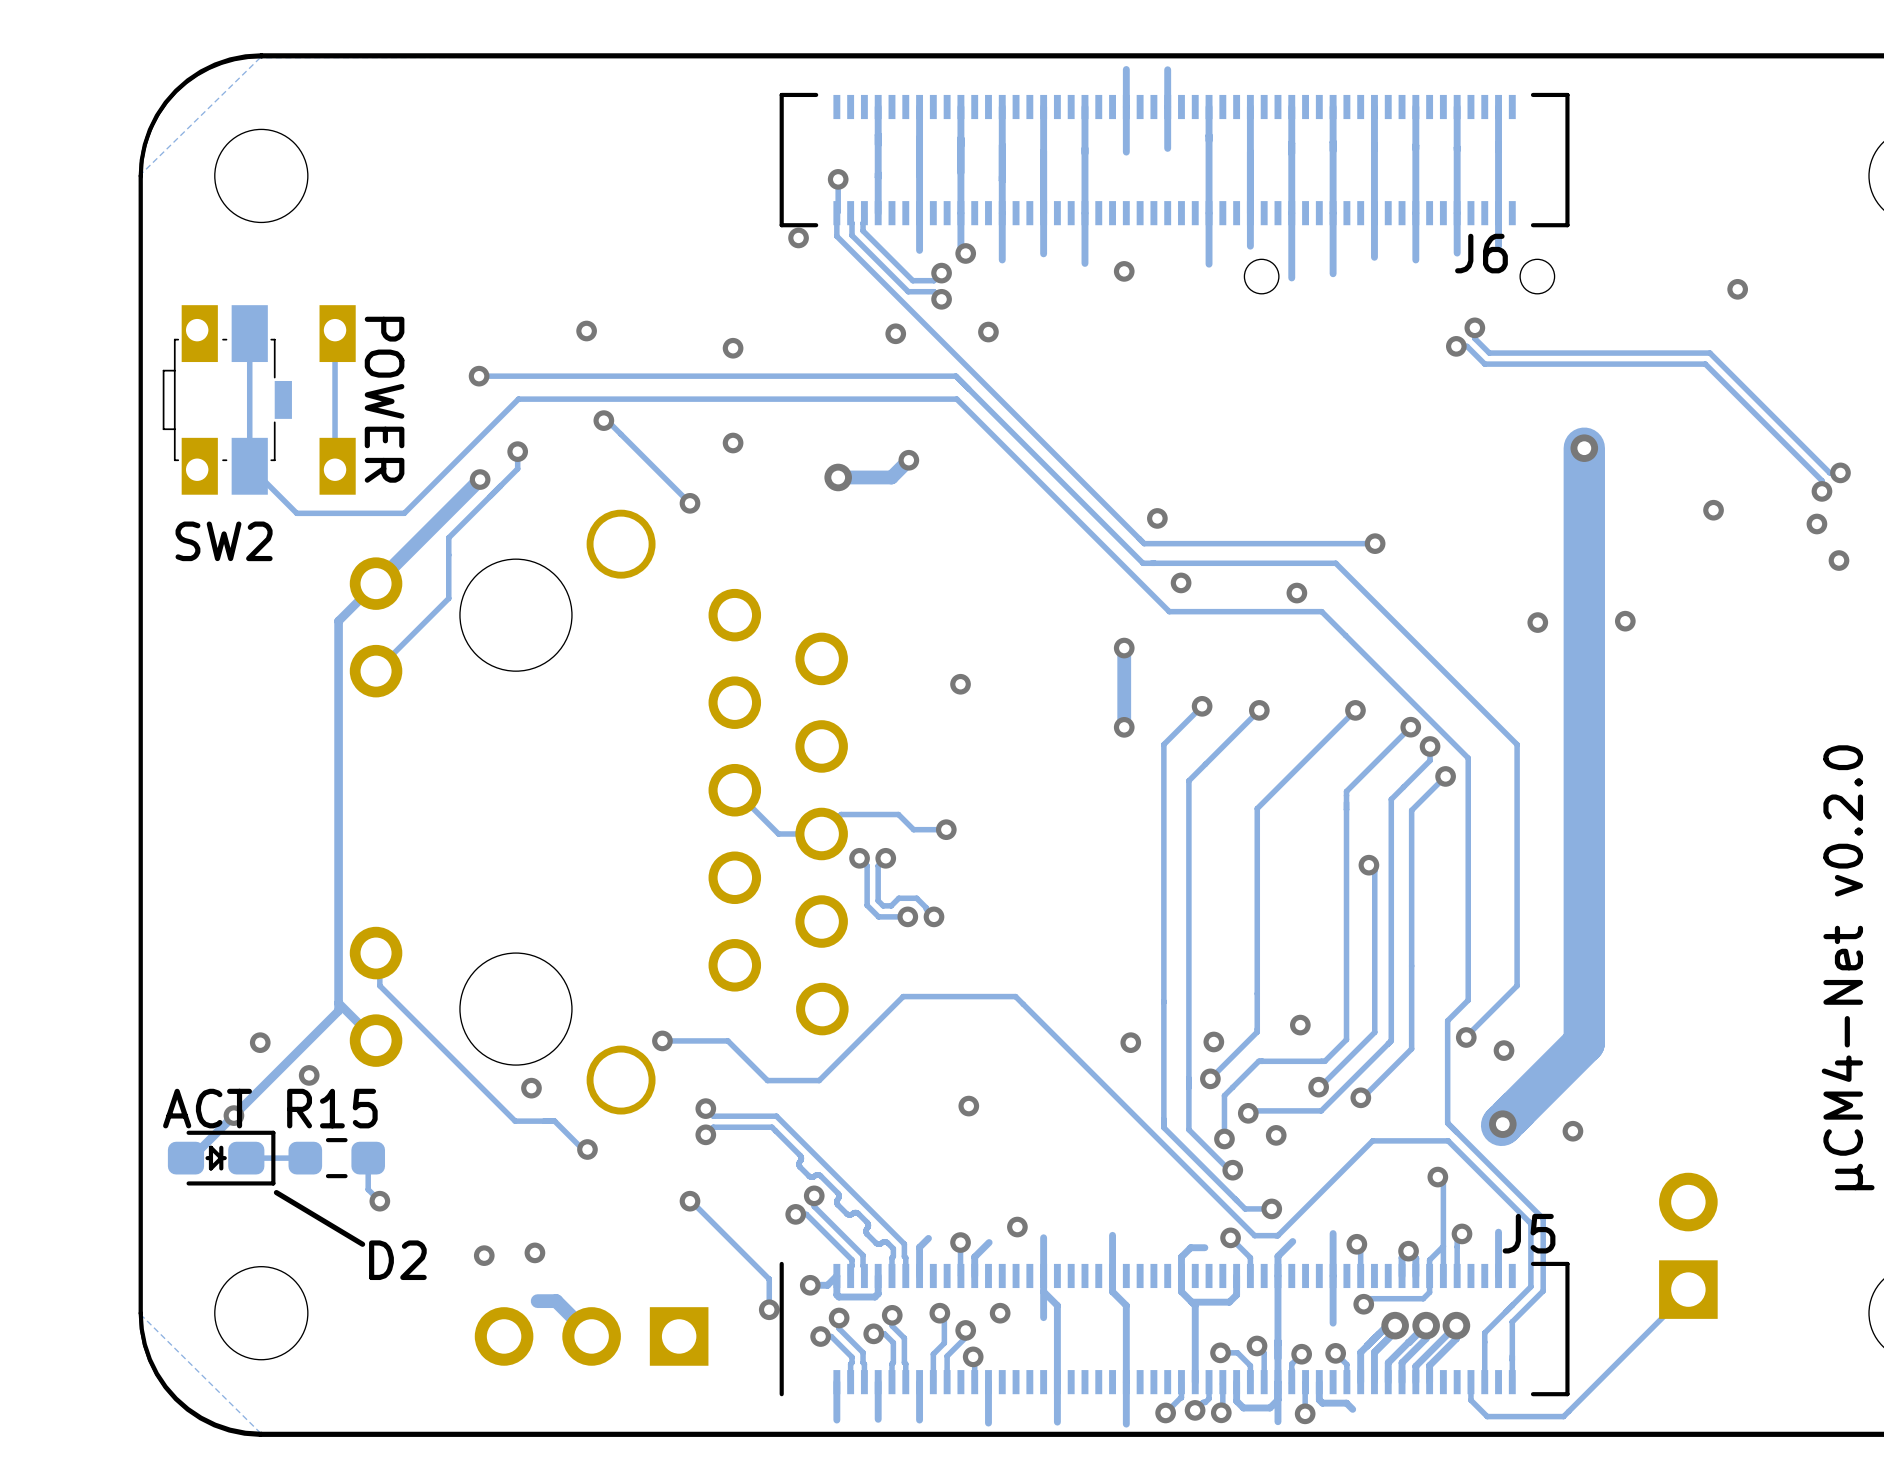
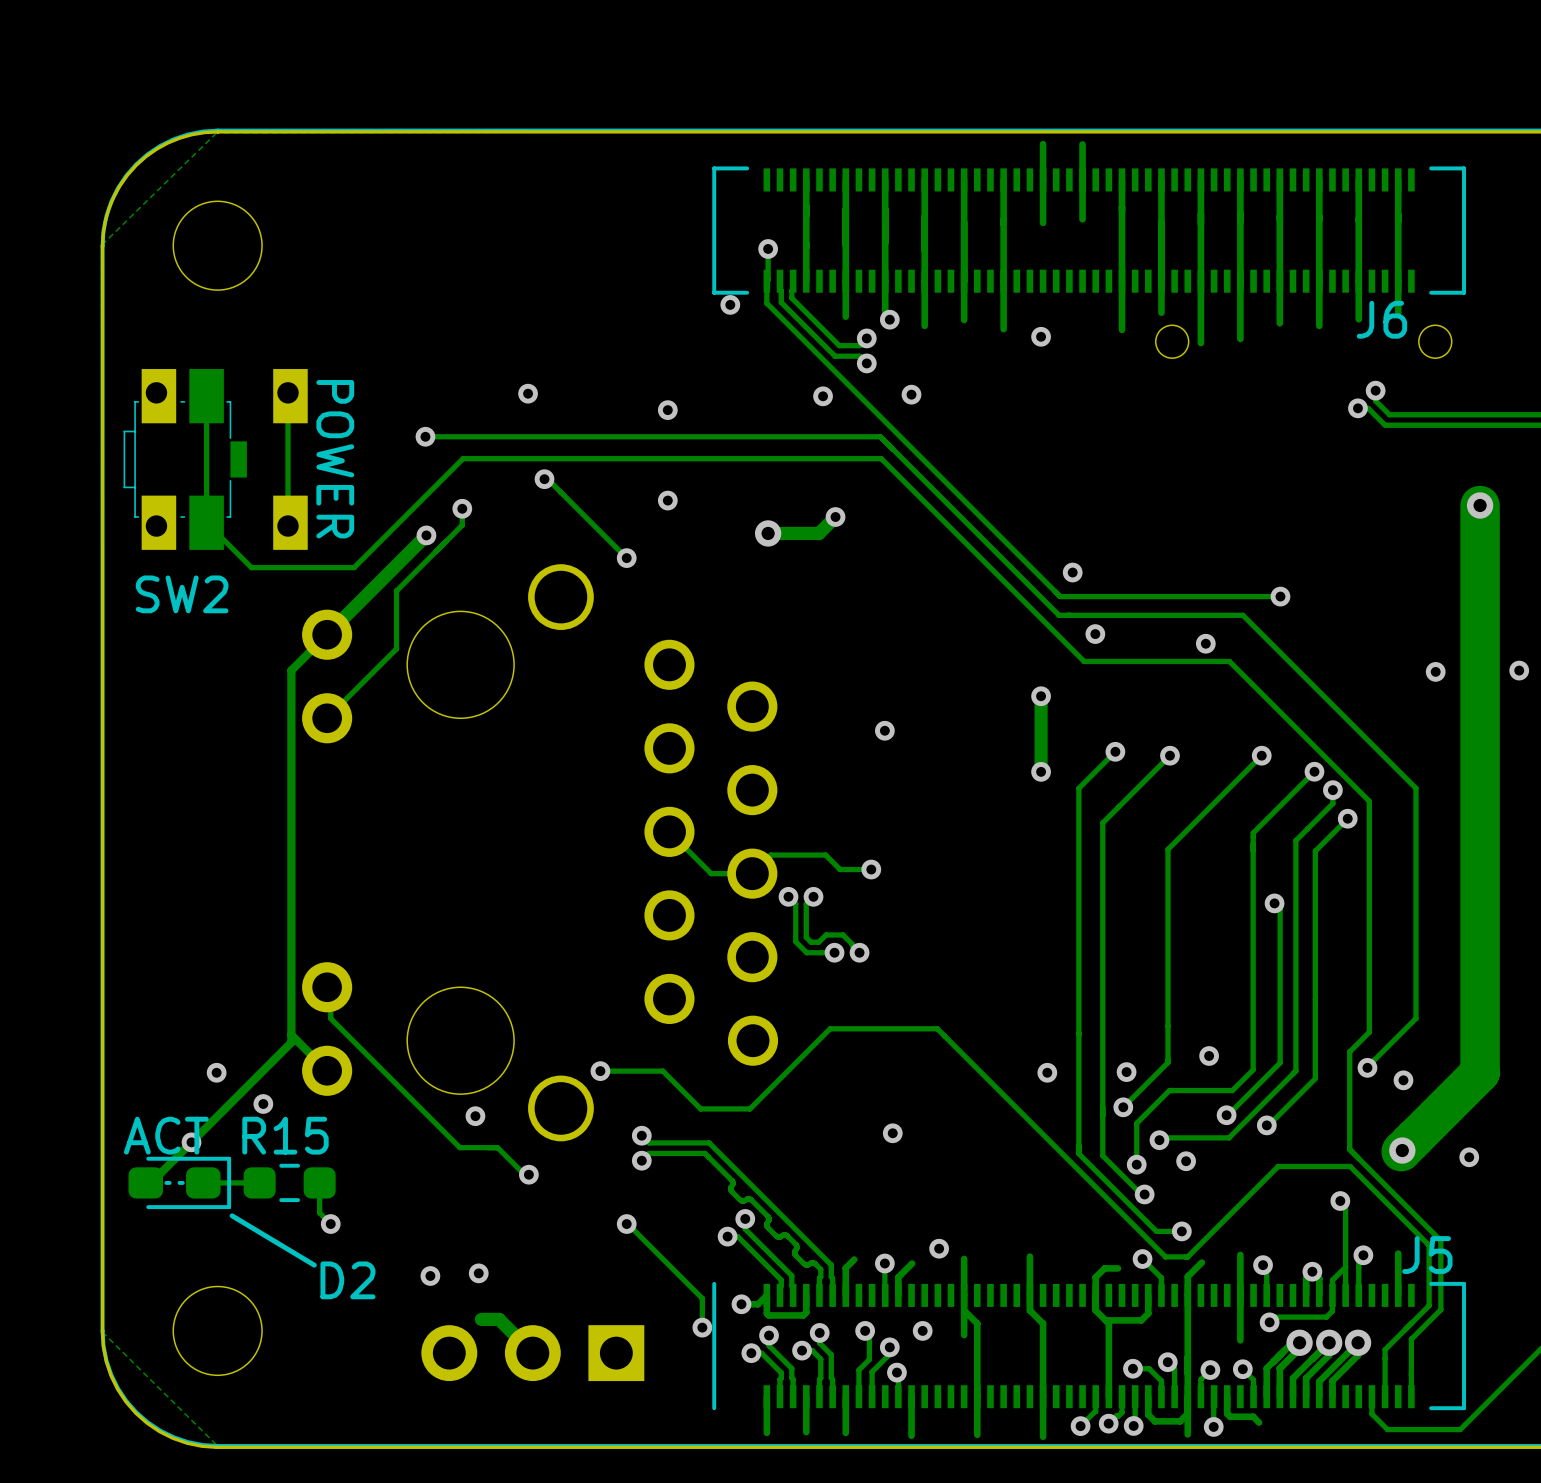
line: (210, 1147) (221, 1158) (210, 1168) (210, 1147) -> none
line: (221, 1147) (221, 1168) -> none

